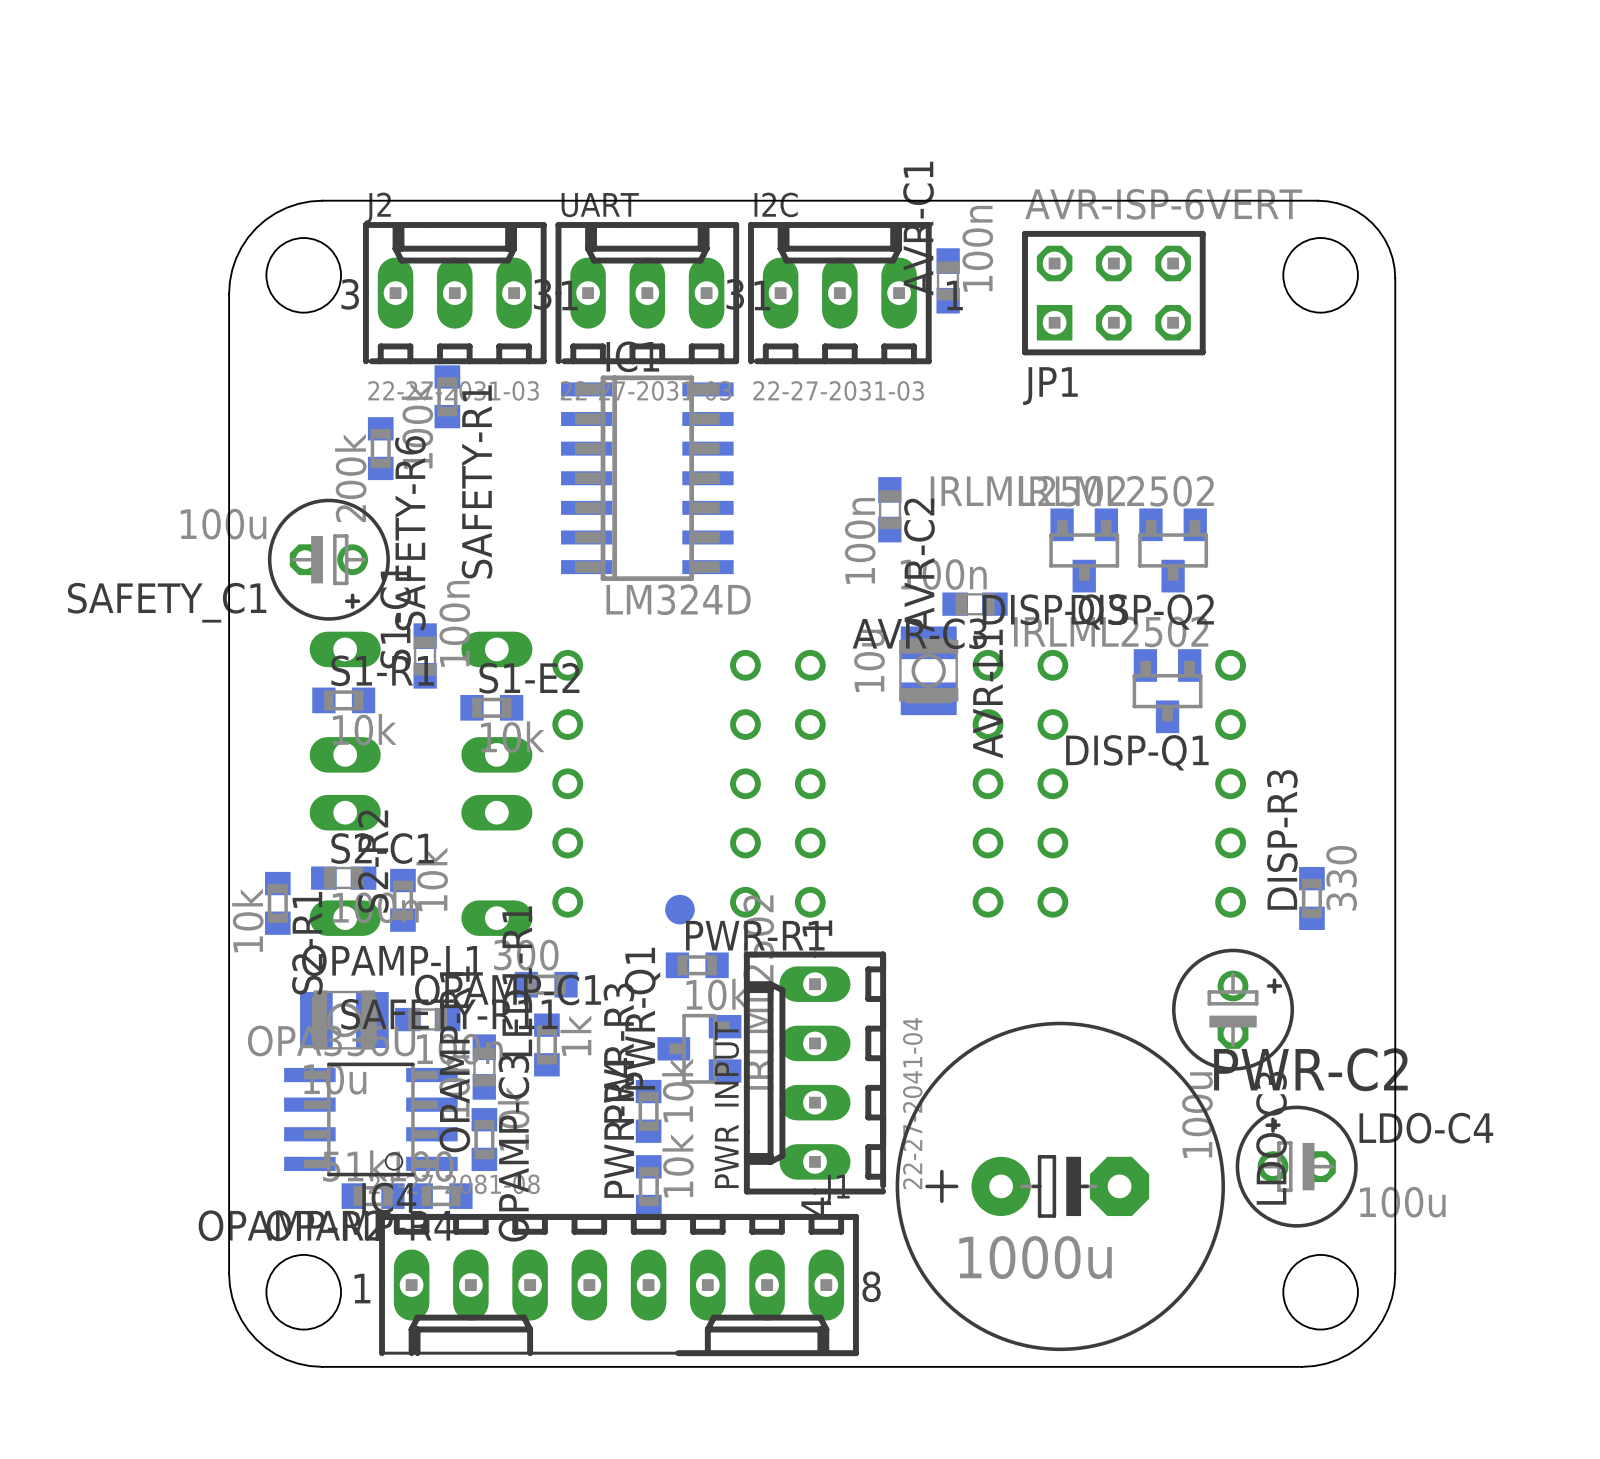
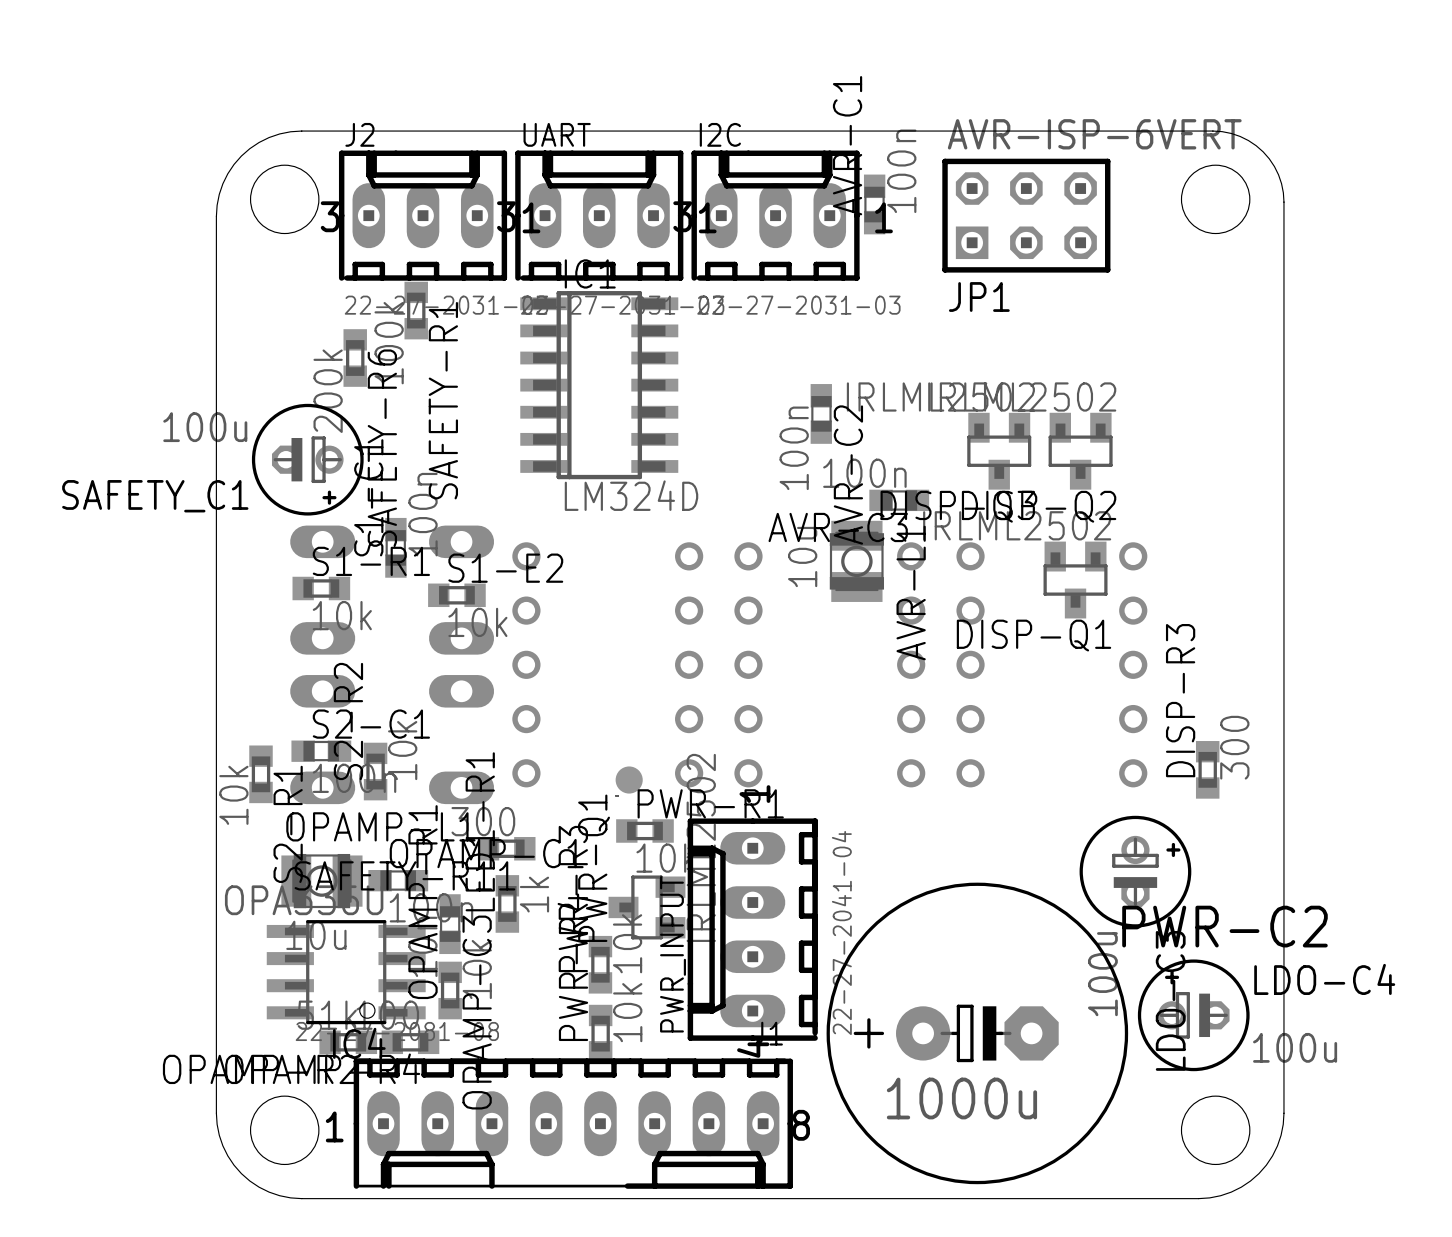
DISP-R3 value: 330 (1341, 878) -> 300 (1234, 747)

